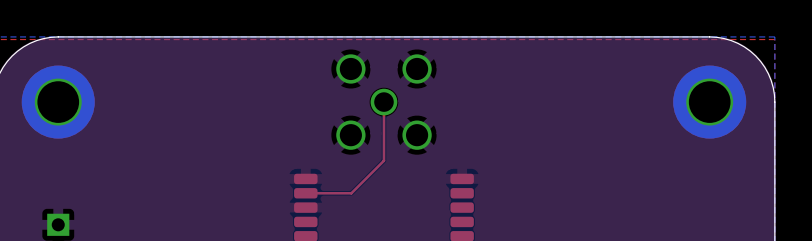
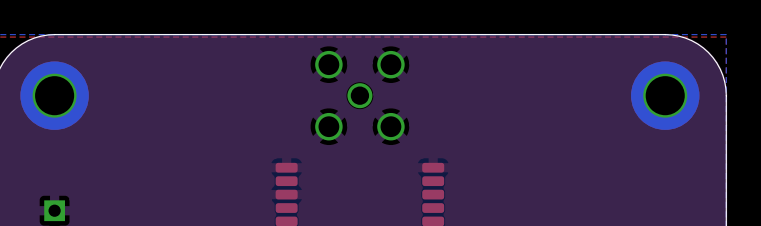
top track: (383, 102) (383, 160) (351, 193) (305, 193) -> none

